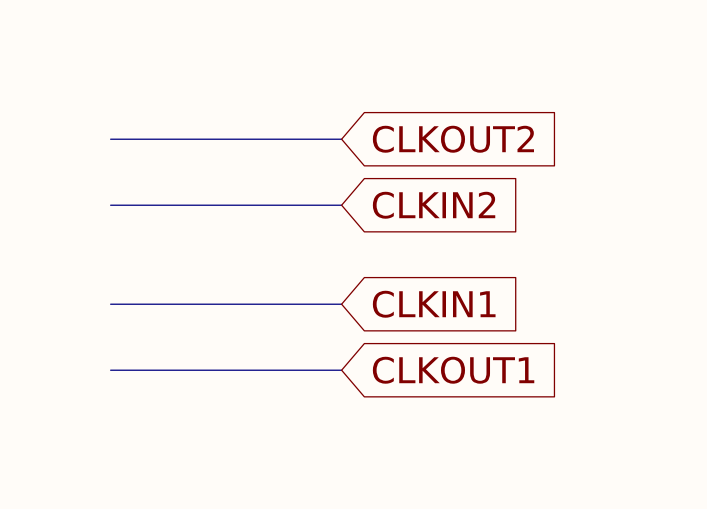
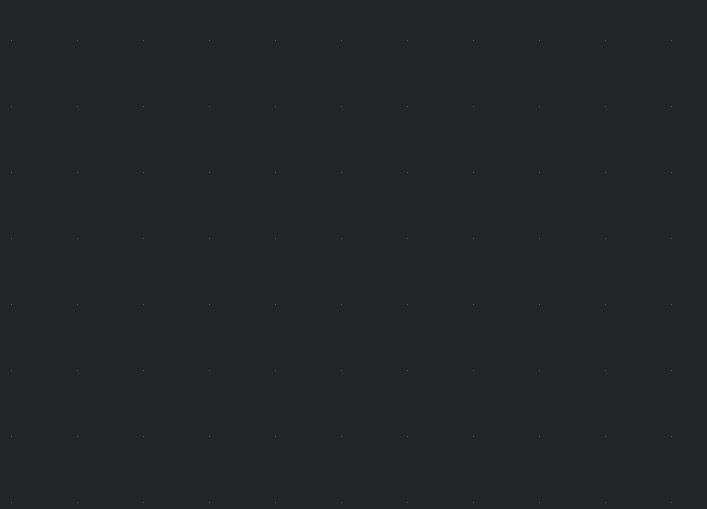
wire: (110, 139) (341, 139) -> none
global label: CLKOUT2 (453, 139) -> none
wire: (110, 205) (341, 205) -> none
global label: CLKIN2 (434, 205) -> none
wire: (110, 304) (341, 304) -> none
global label: CLKIN1 (434, 304) -> none
wire: (110, 370) (341, 370) -> none
global label: CLKOUT1 (453, 370) -> none

